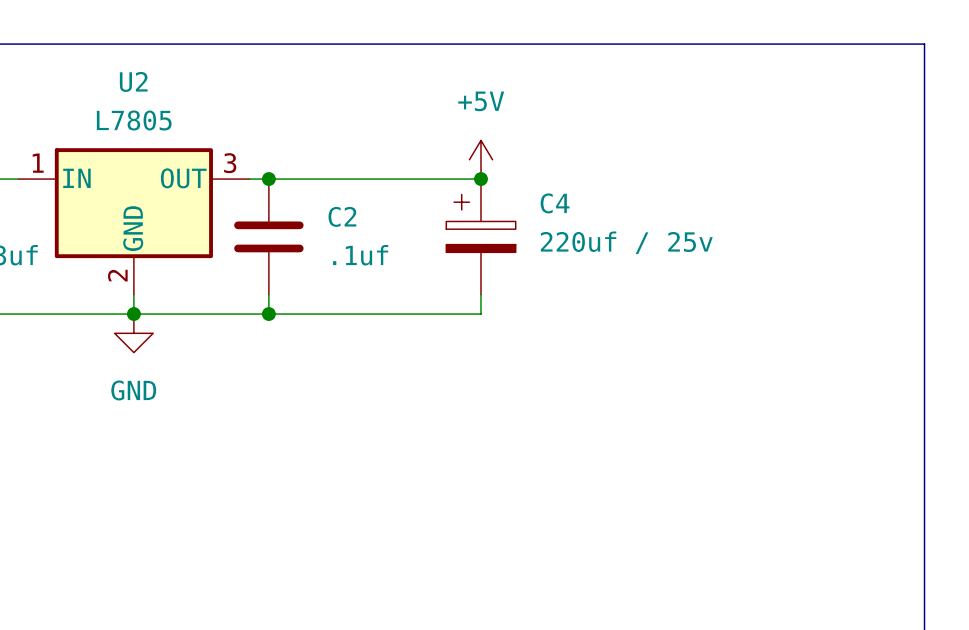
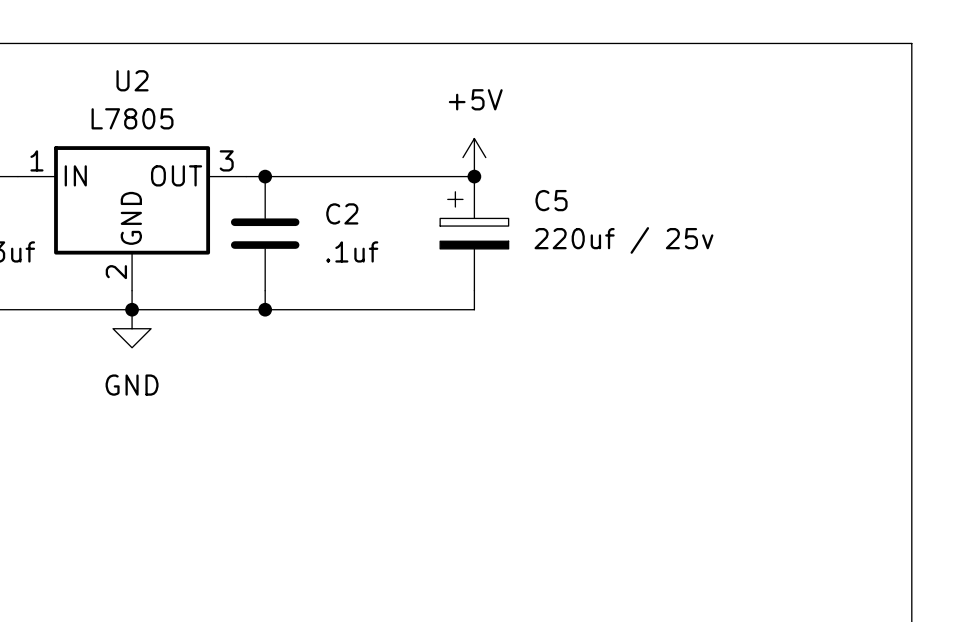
C4 name: C4 (555, 203) -> C5 (551, 200)

